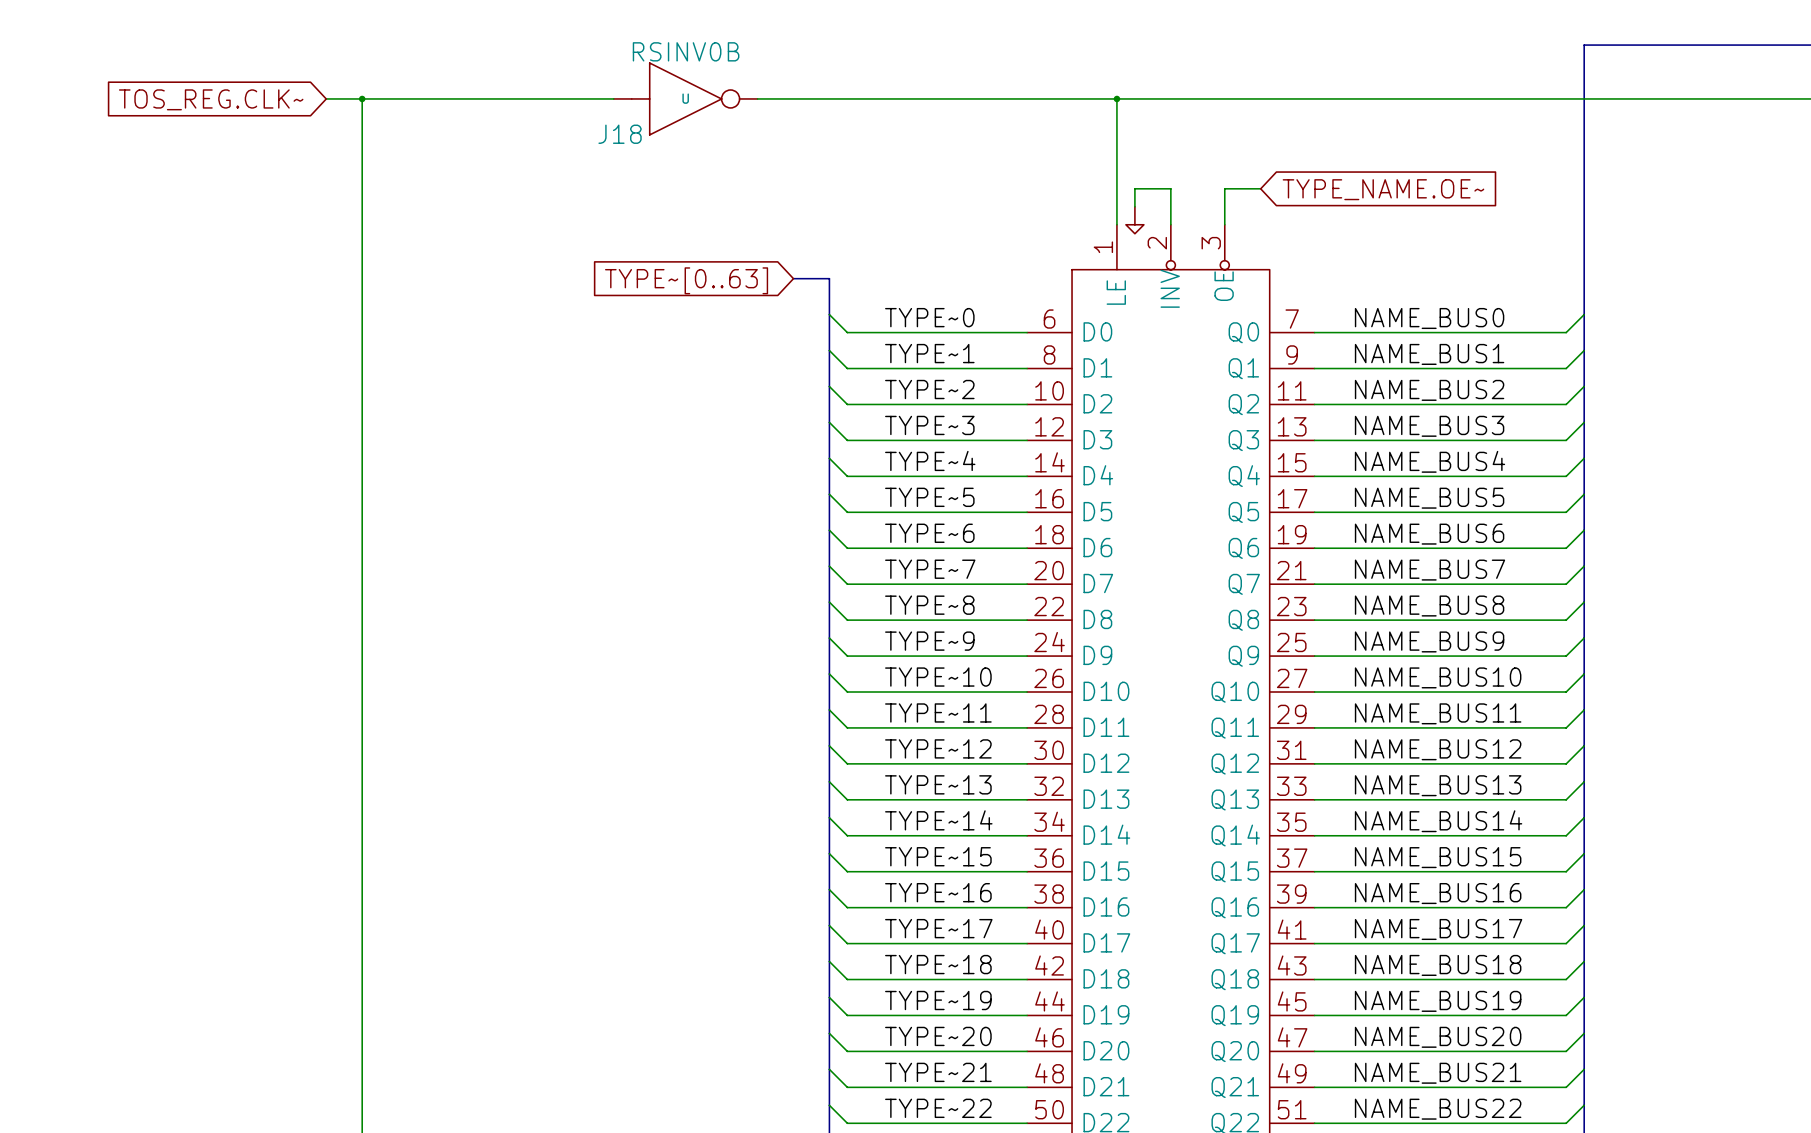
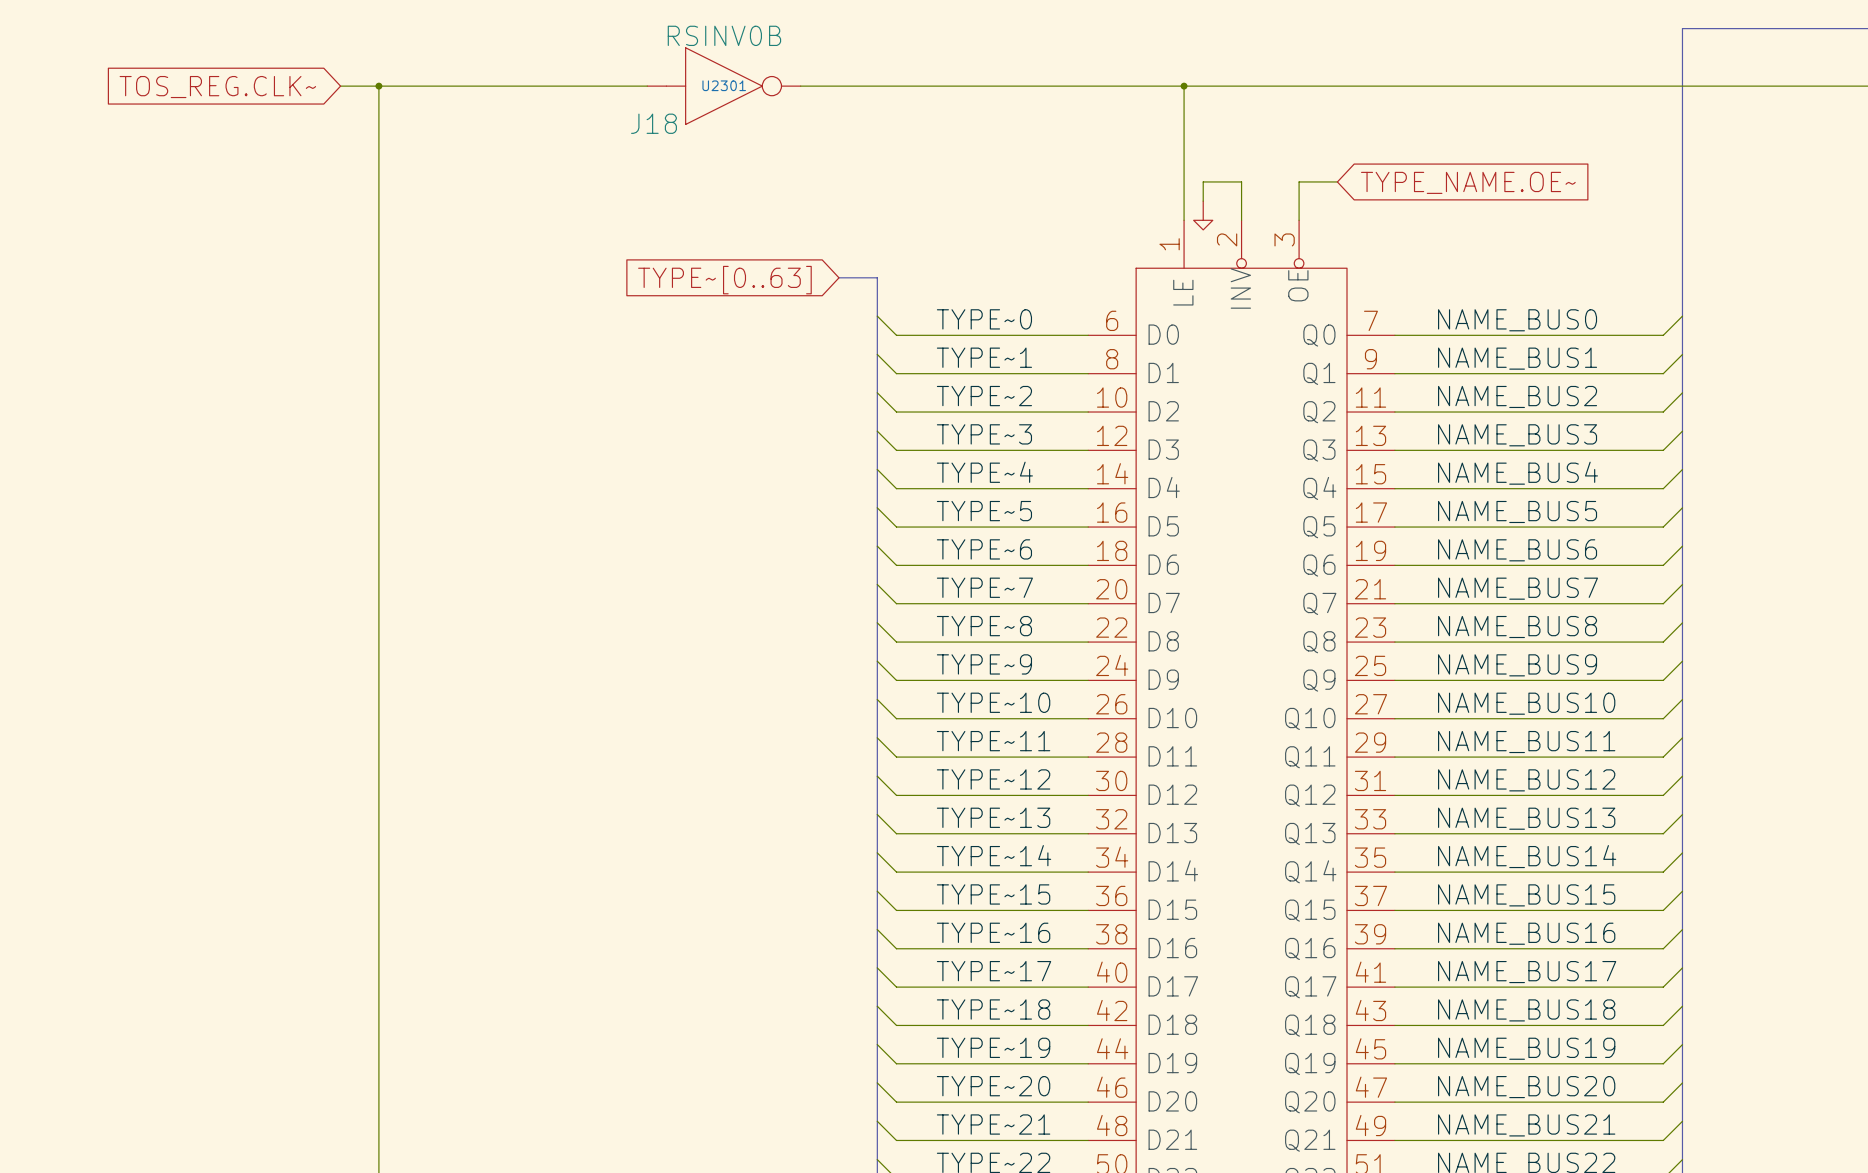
U name: U (685, 98) -> U2301 (724, 85)

